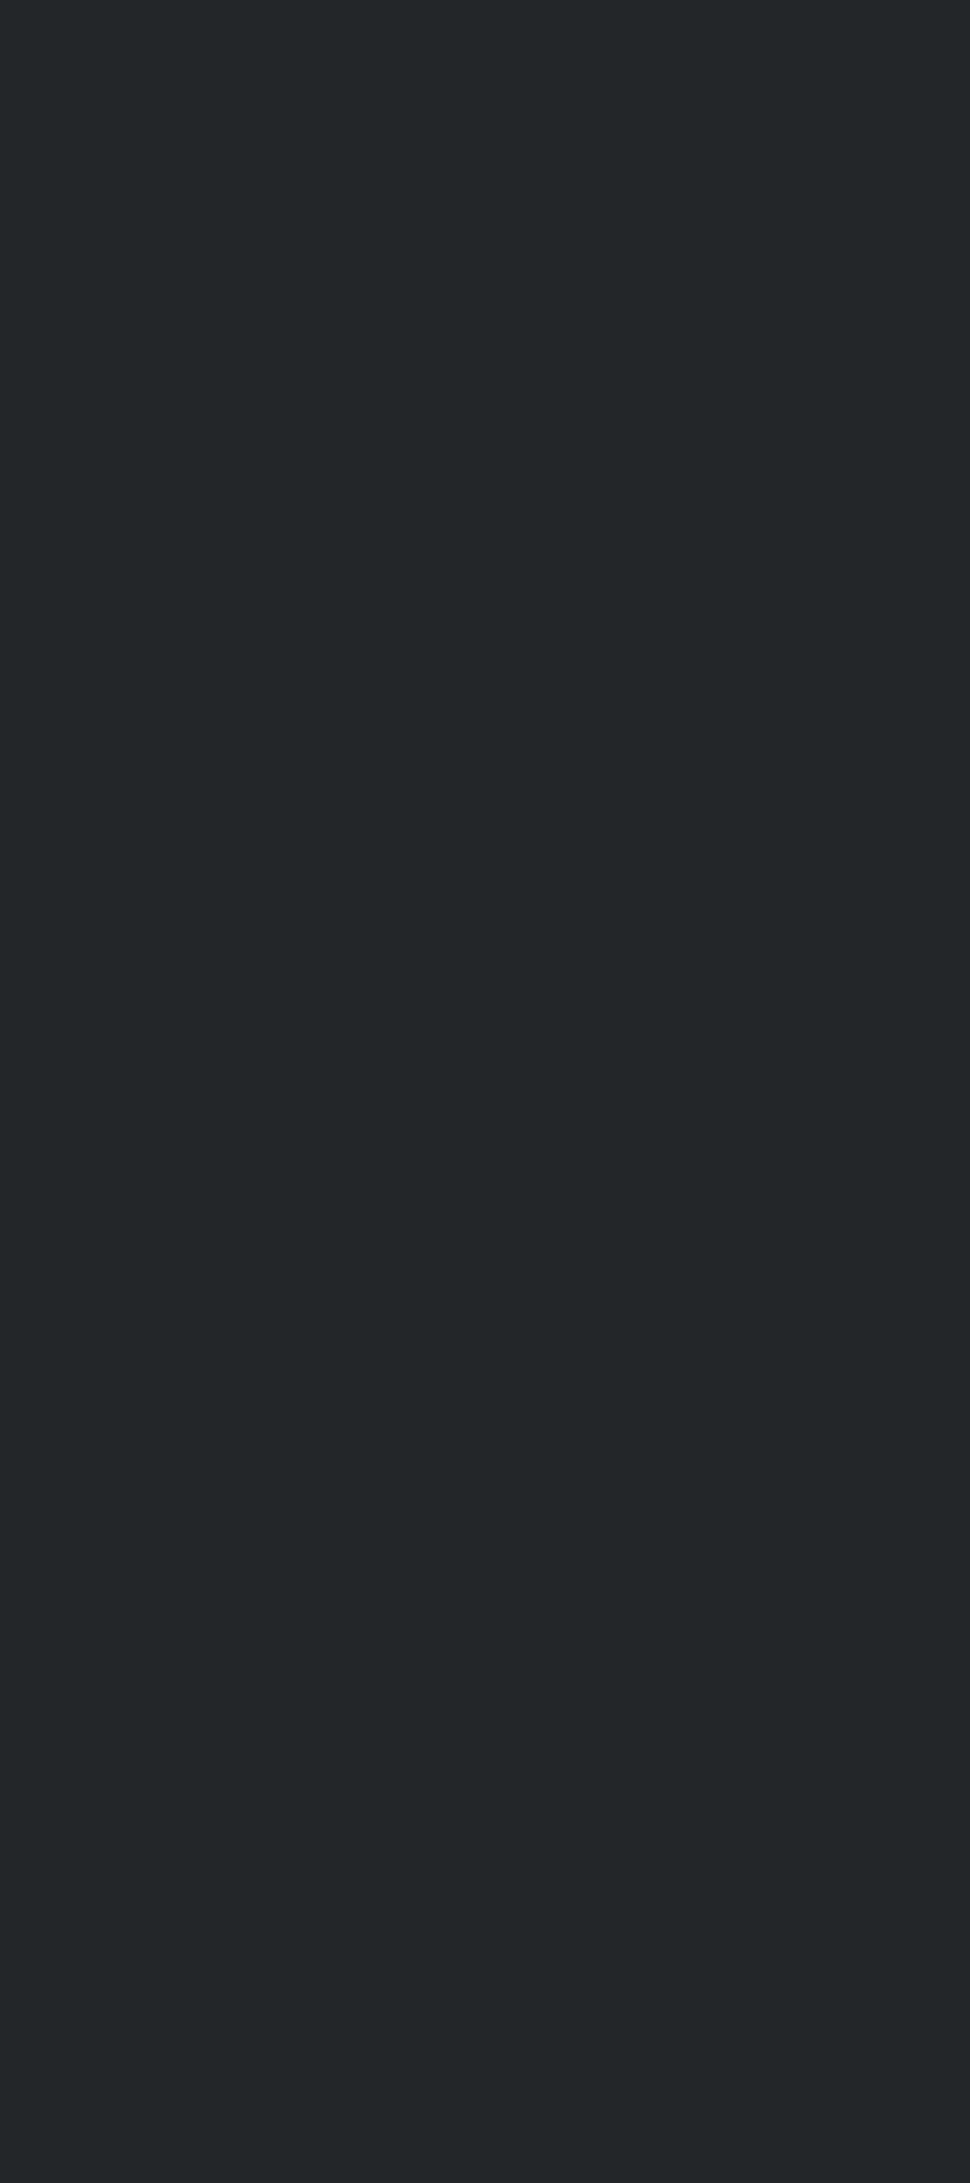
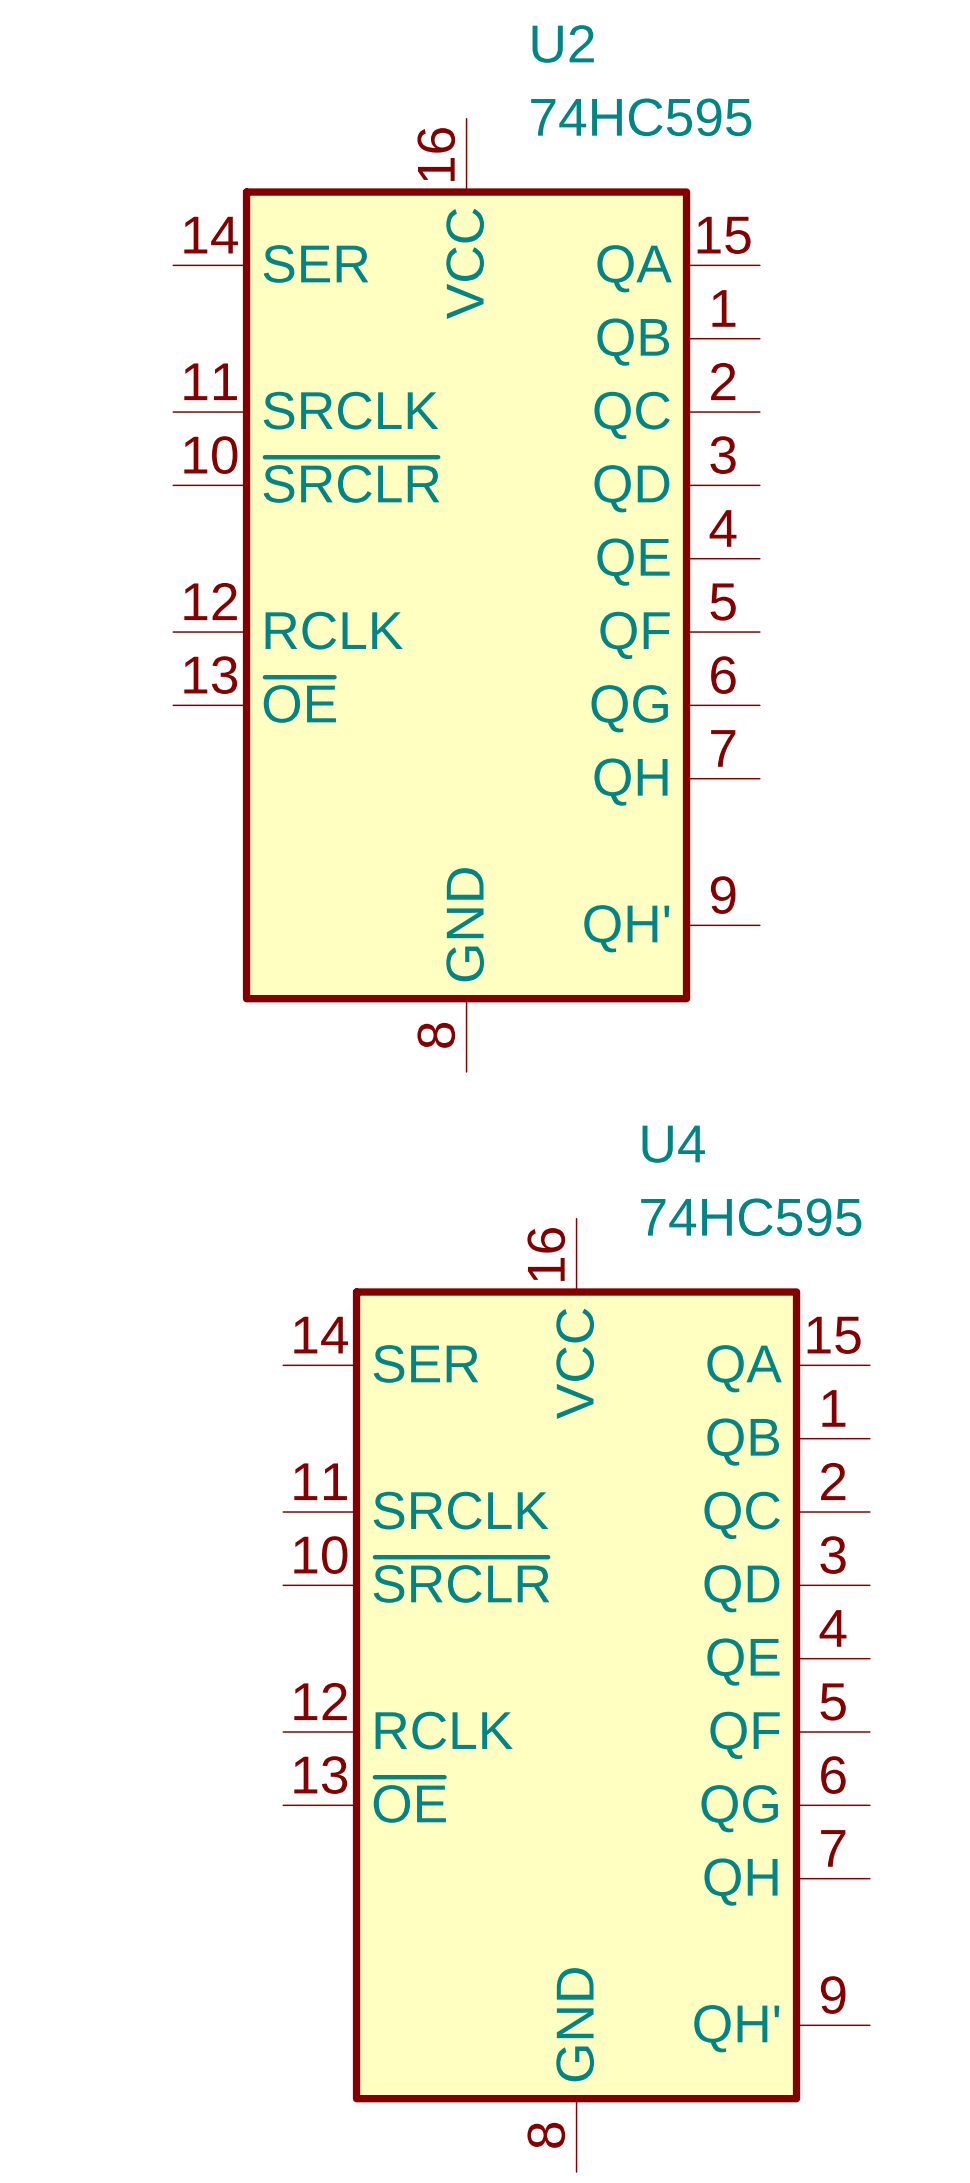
U2: none -> 74HC595 (466, 595)
U4: none -> 74HC595 (576, 1695)

